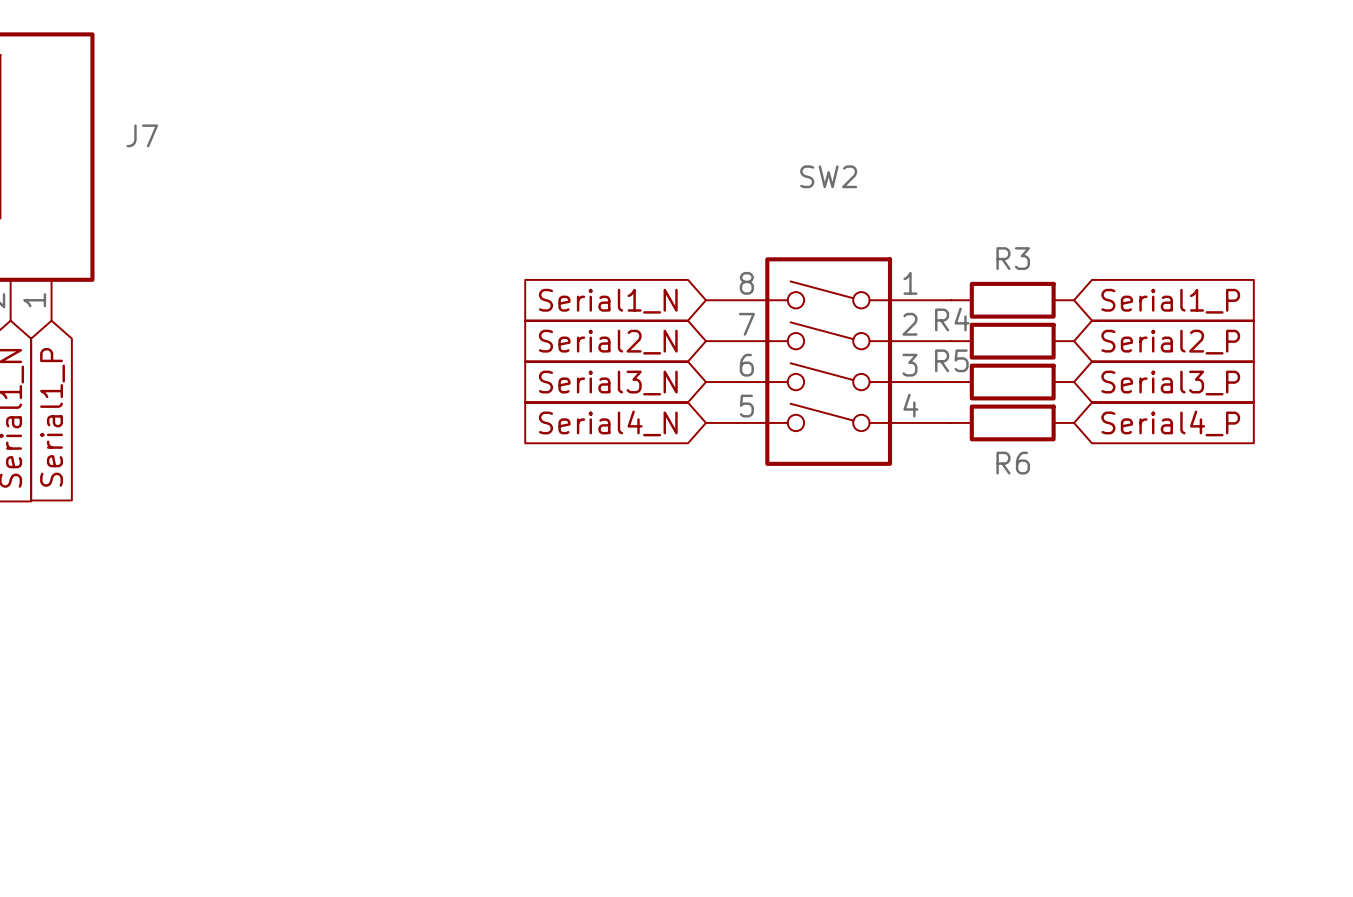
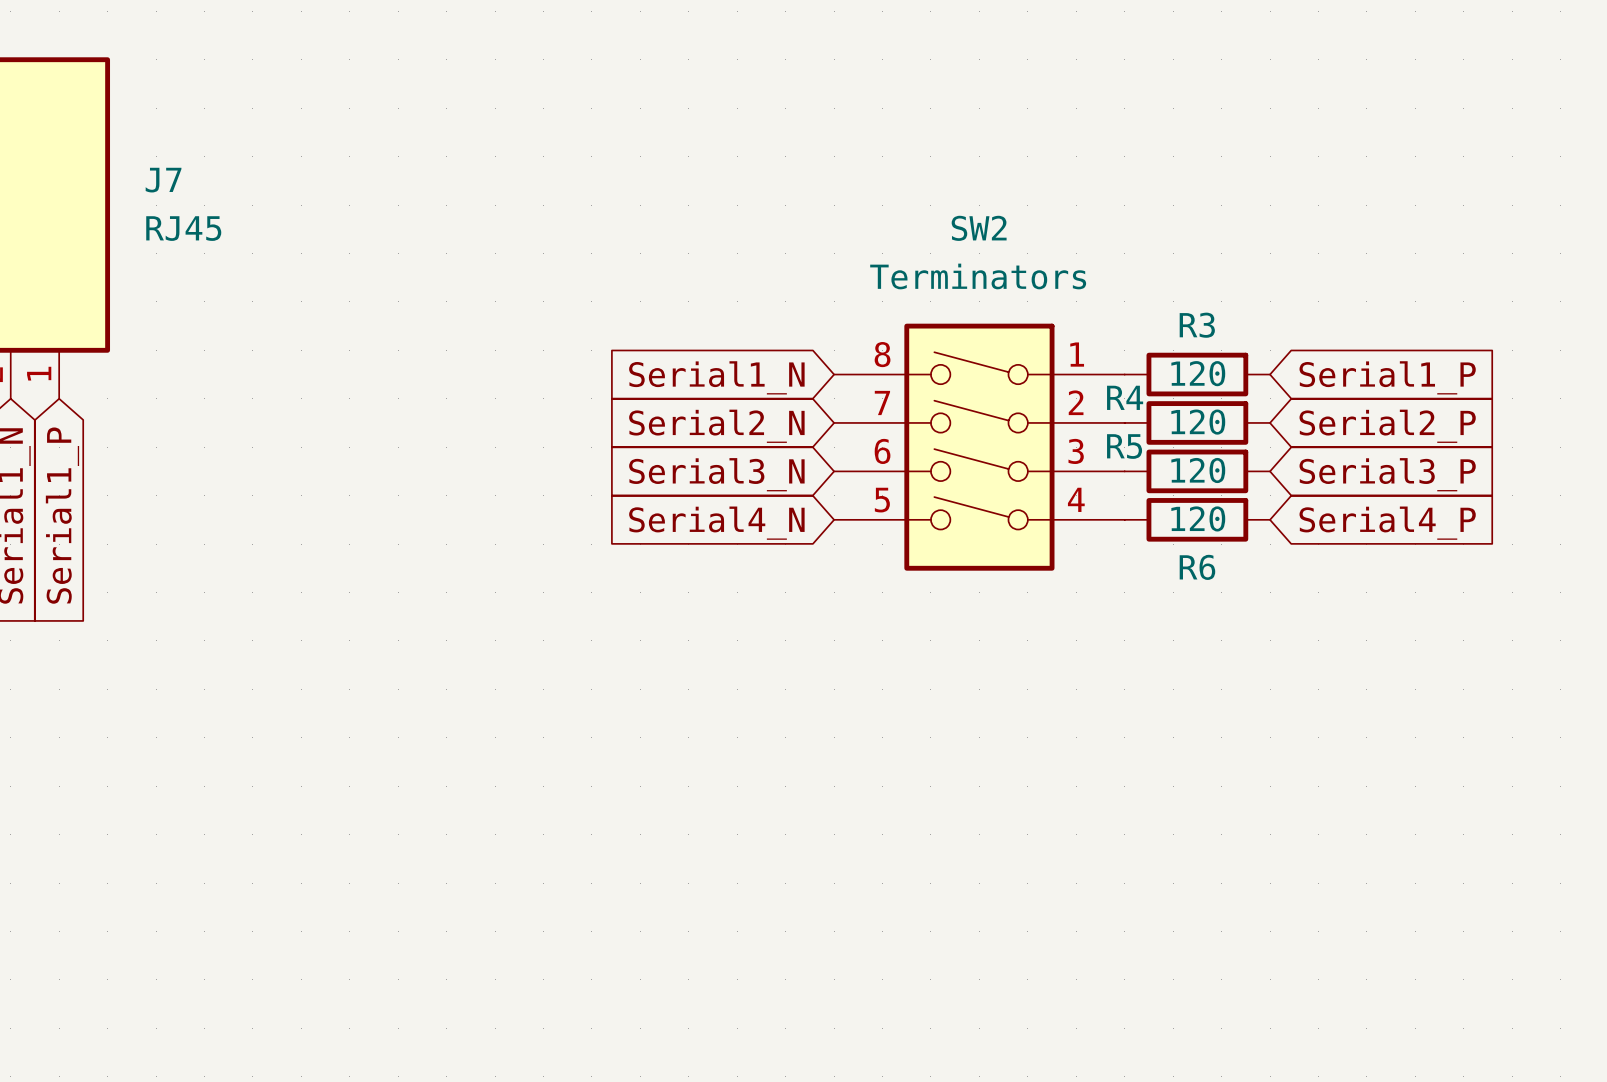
J7 value: none -> RJ45 (183, 228)
SW2 value: none -> Terminators (978, 276)
R3 value: none -> 120 (1198, 373)
R4 value: none -> 120 (1198, 422)
R5 value: none -> 120 (1198, 470)
R6 value: none -> 120 (1198, 518)

